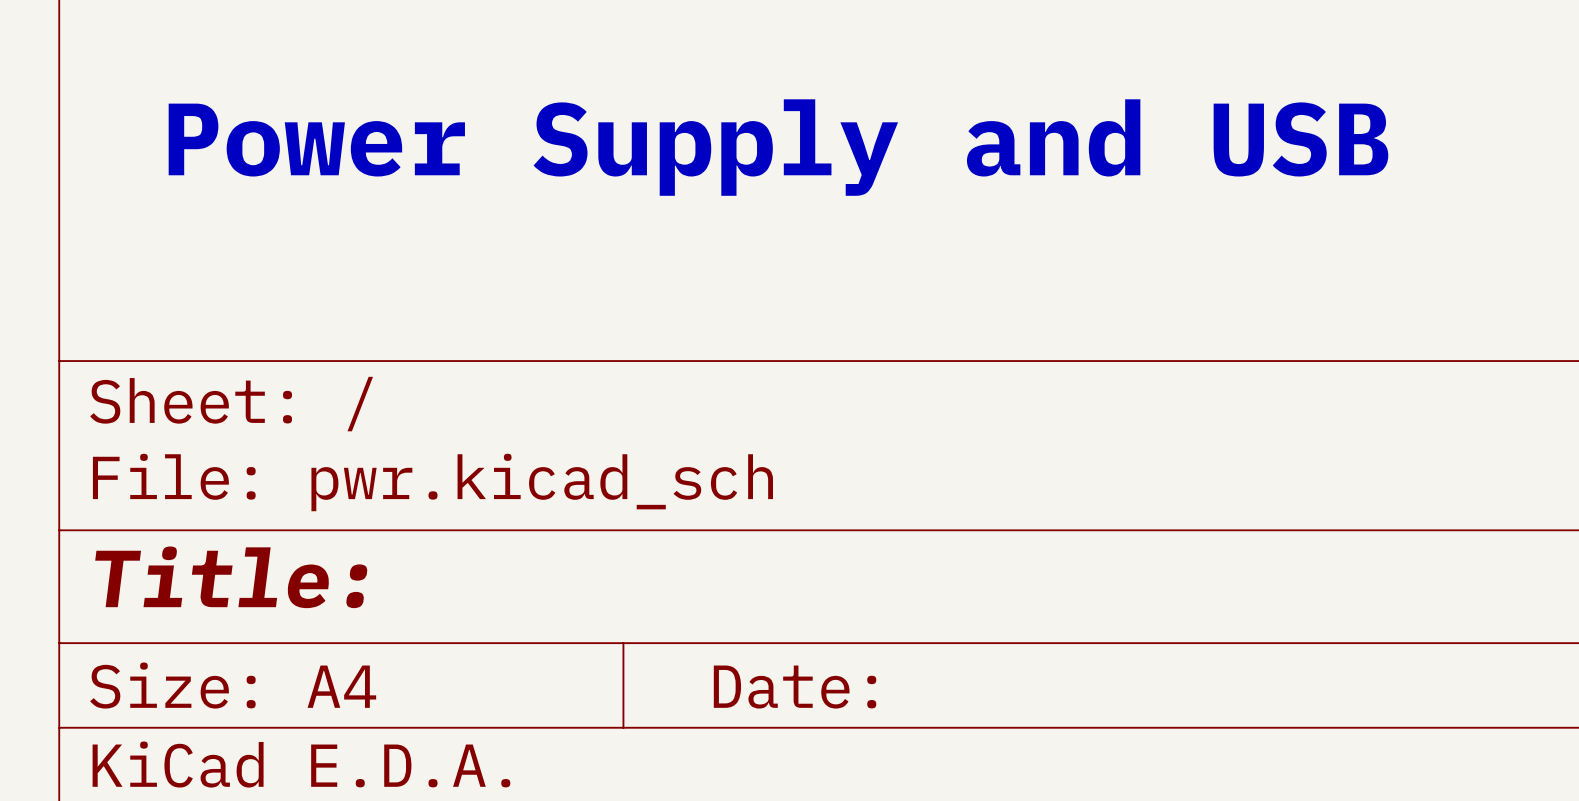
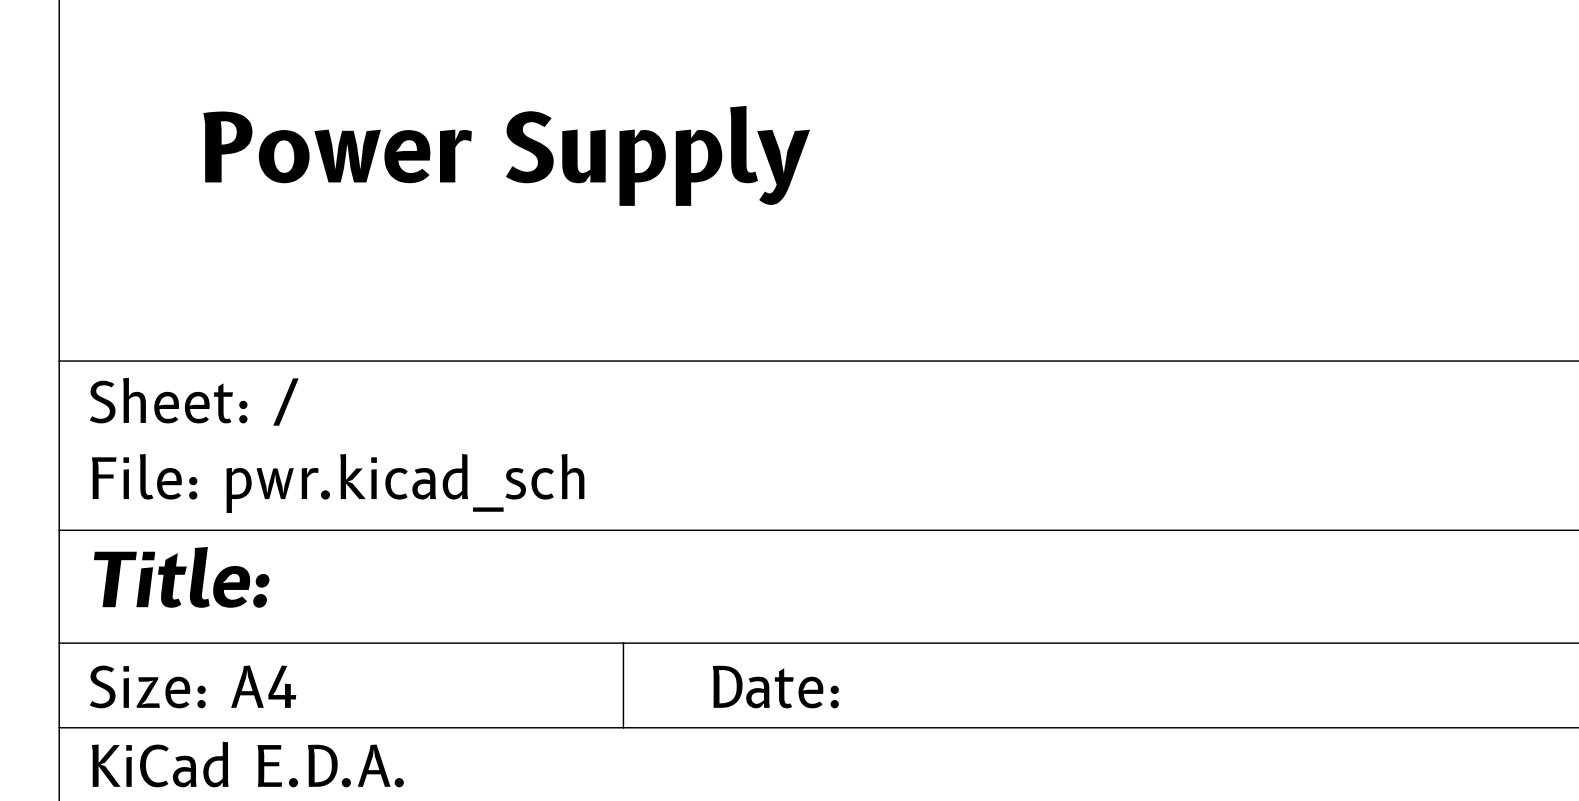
text: Power Supply and USB (778, 147) -> Power Supply (506, 155)

